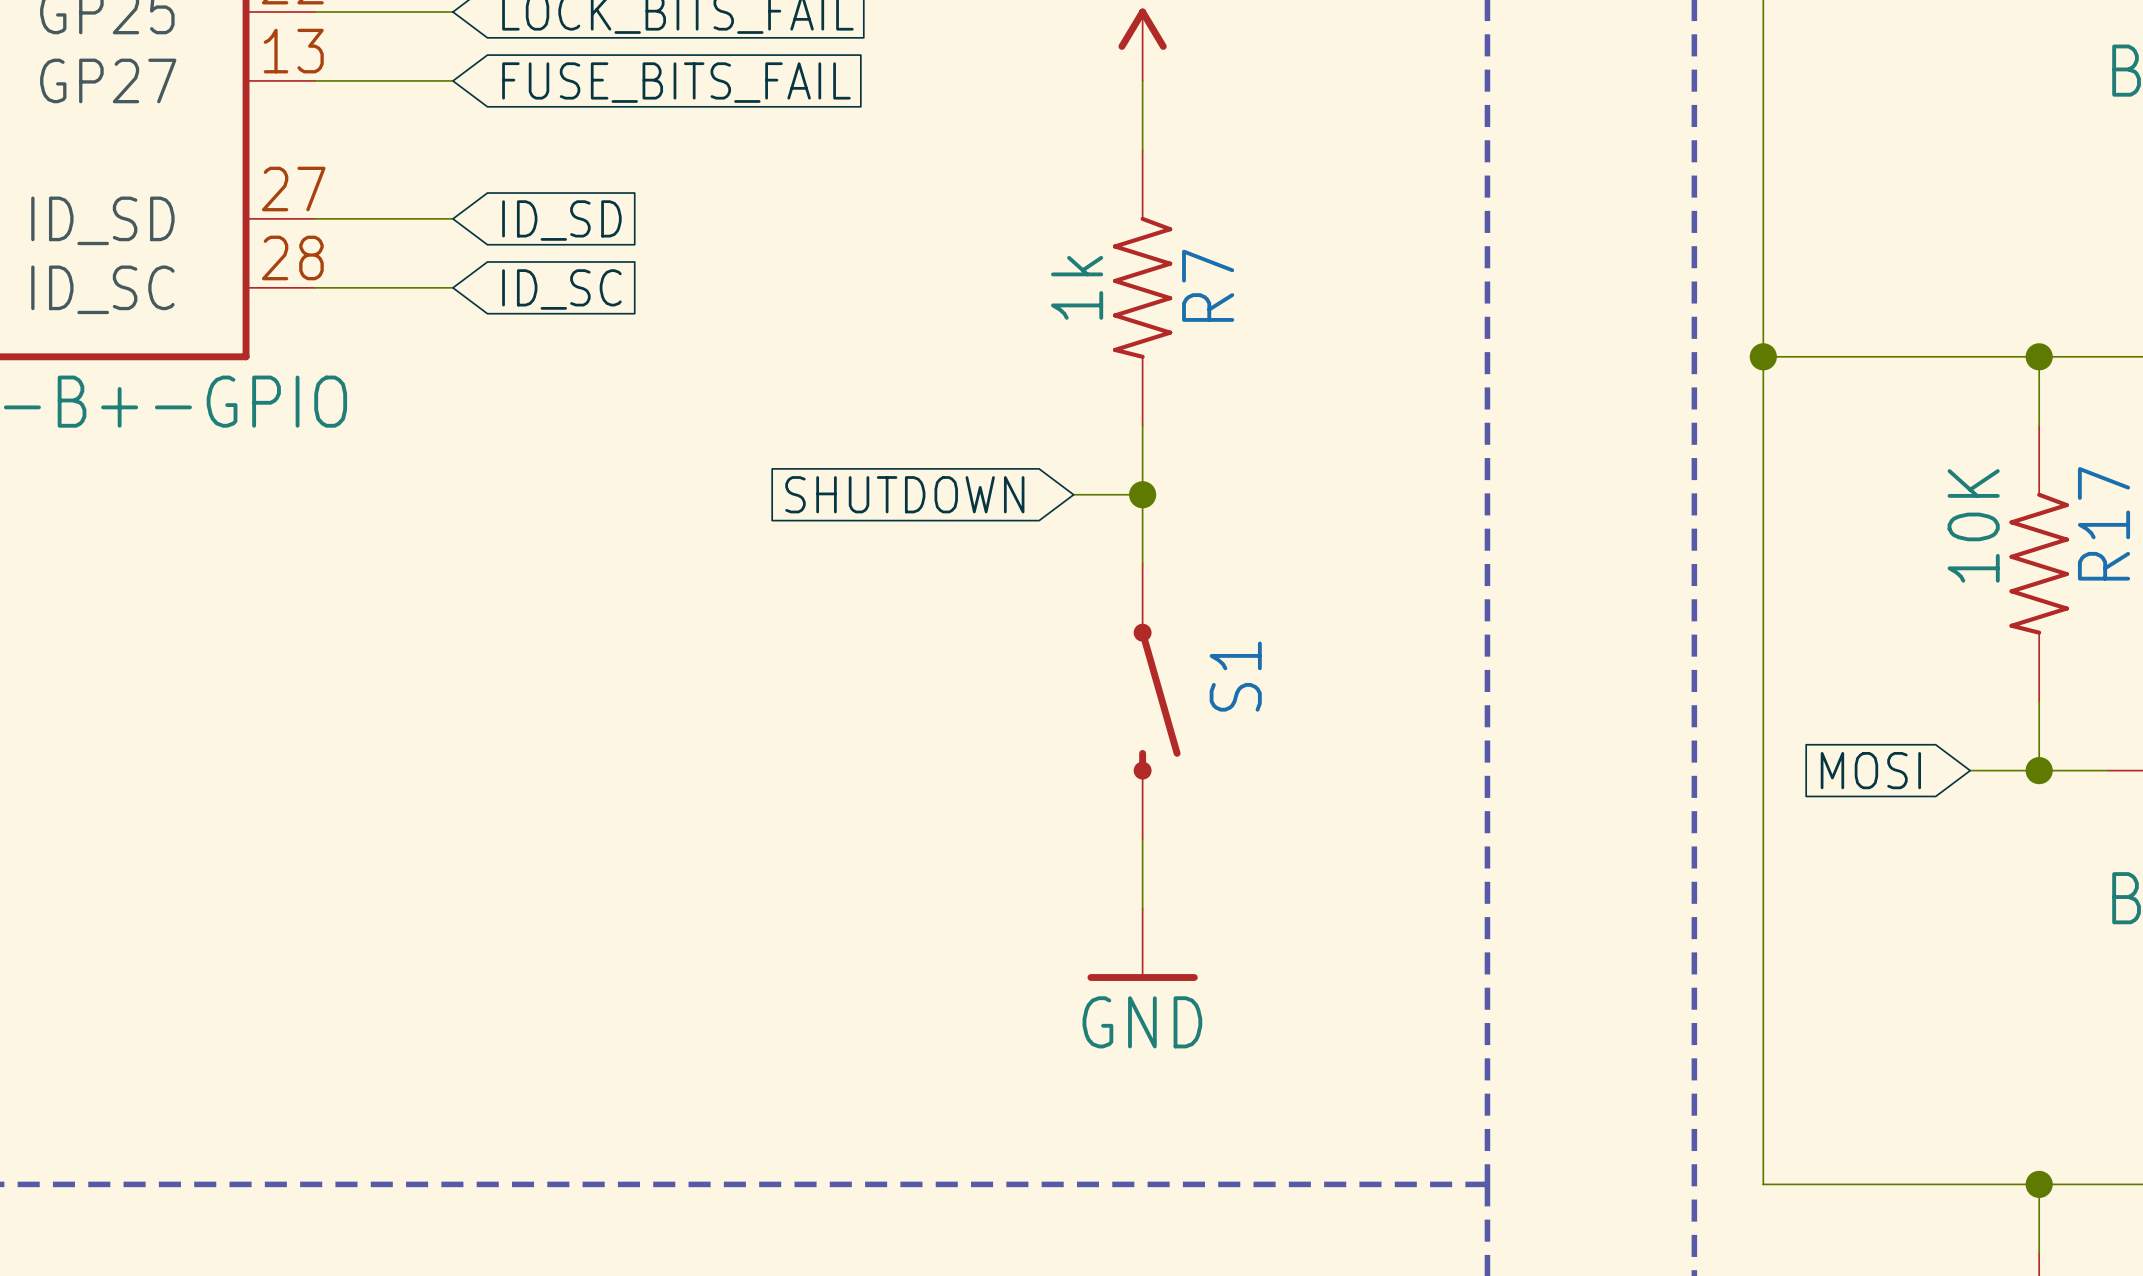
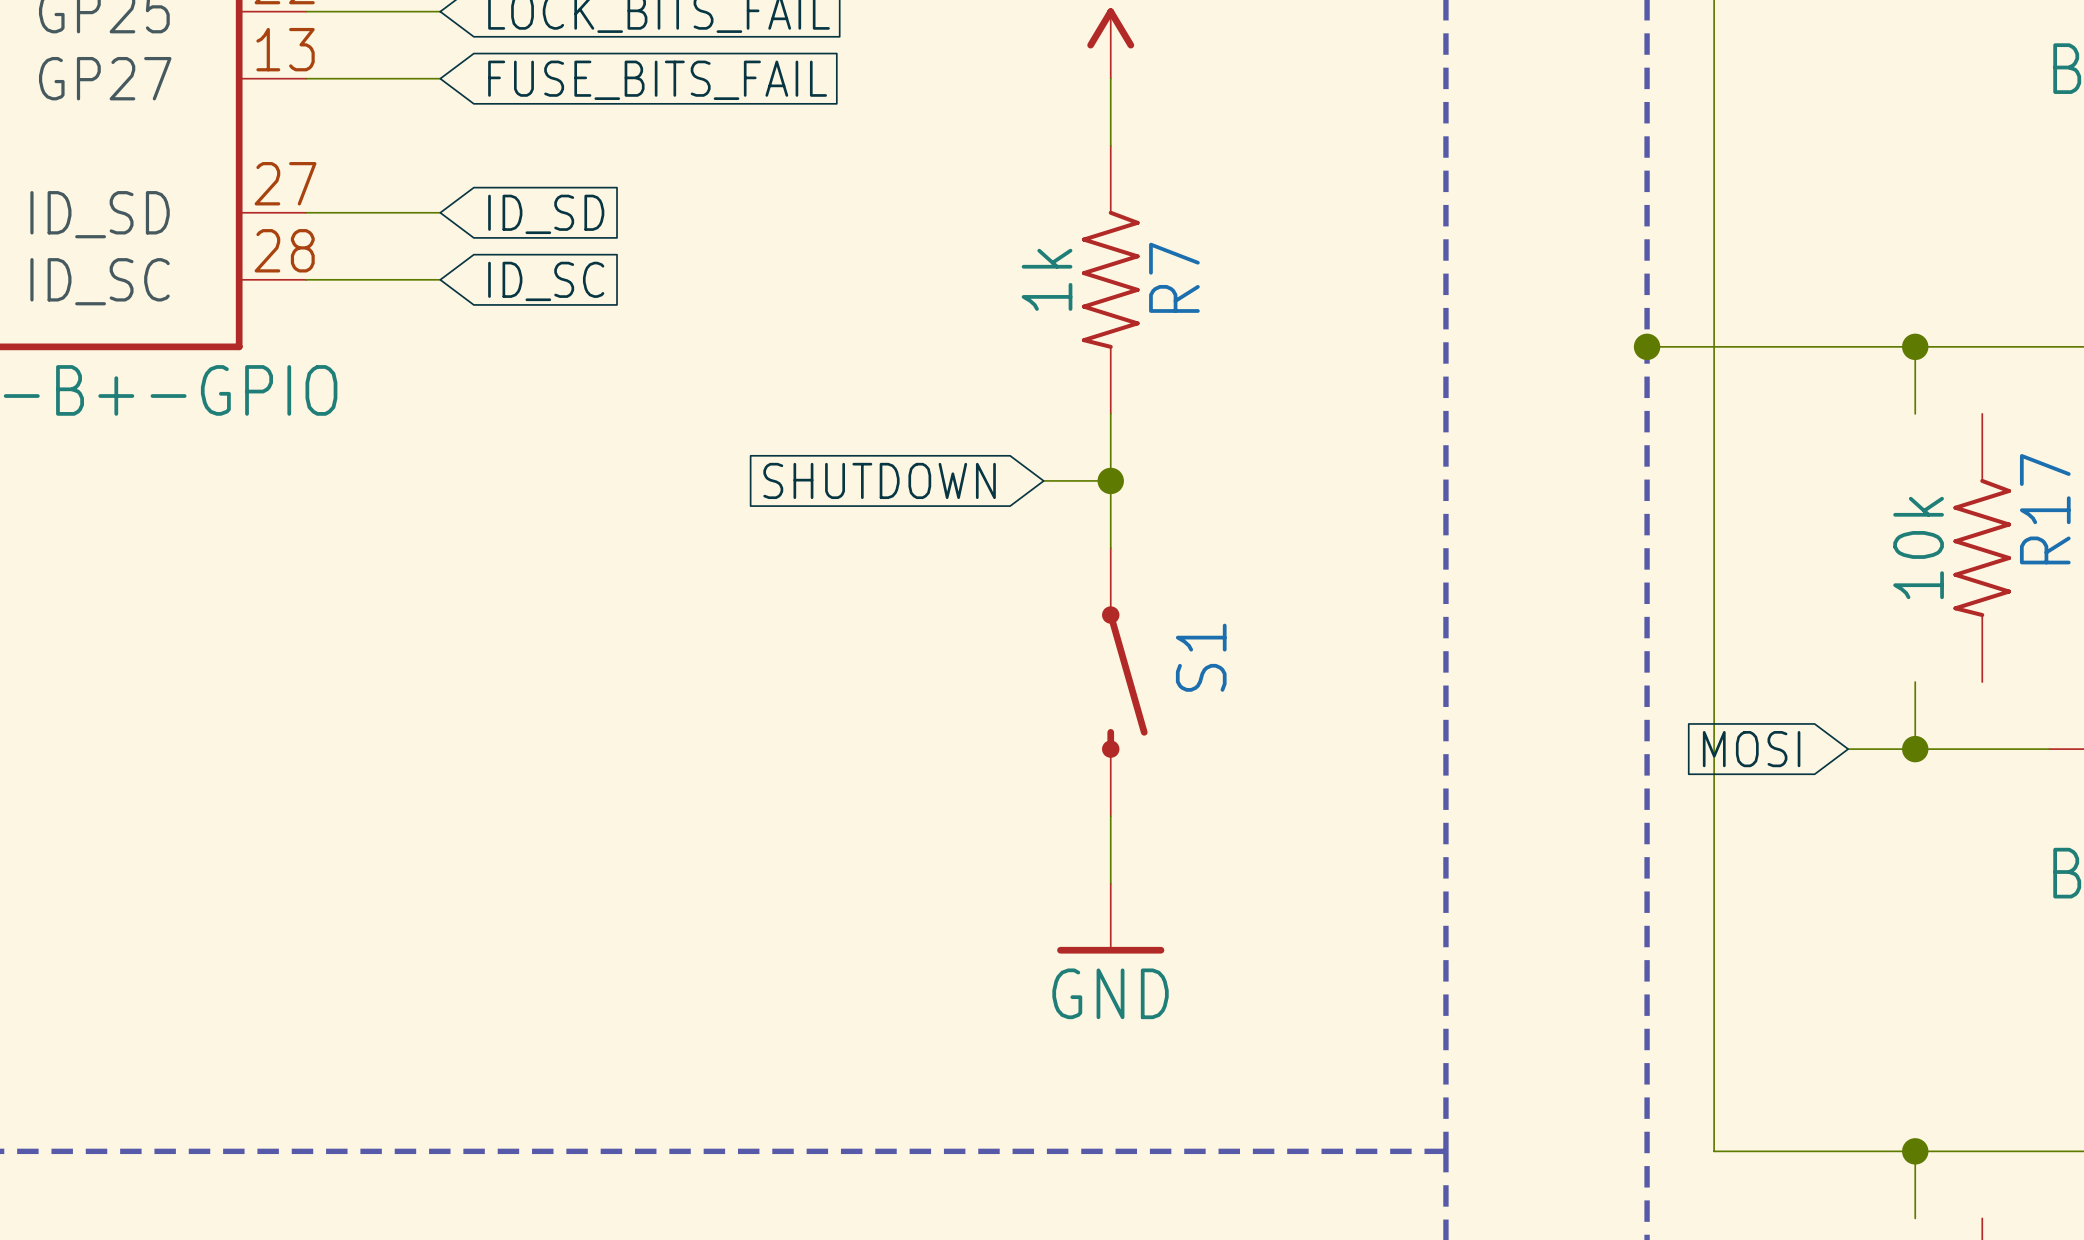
wire: none -> (1647, 346) (1714, 346)
junction position: (1763, 356) -> (1647, 346)
wire: (2039, 356) (2039, 425) -> (1915, 346) (1915, 413)
junction position: (2039, 356) -> (1915, 346)
R17 value: 10K (1973, 525) -> 10k (1918, 547)
wire: none -> (1915, 682) (1915, 749) (1848, 749)
wire: (2039, 701) (2039, 770) -> none
global label position: MOSI (1870, 770) -> MOSI (1751, 749)
junction position: (2039, 770) -> (1915, 749)
wire: (2039, 1184) (2039, 1253) -> (1915, 1151) (1915, 1218)
junction position: (2039, 1184) -> (1915, 1151)

